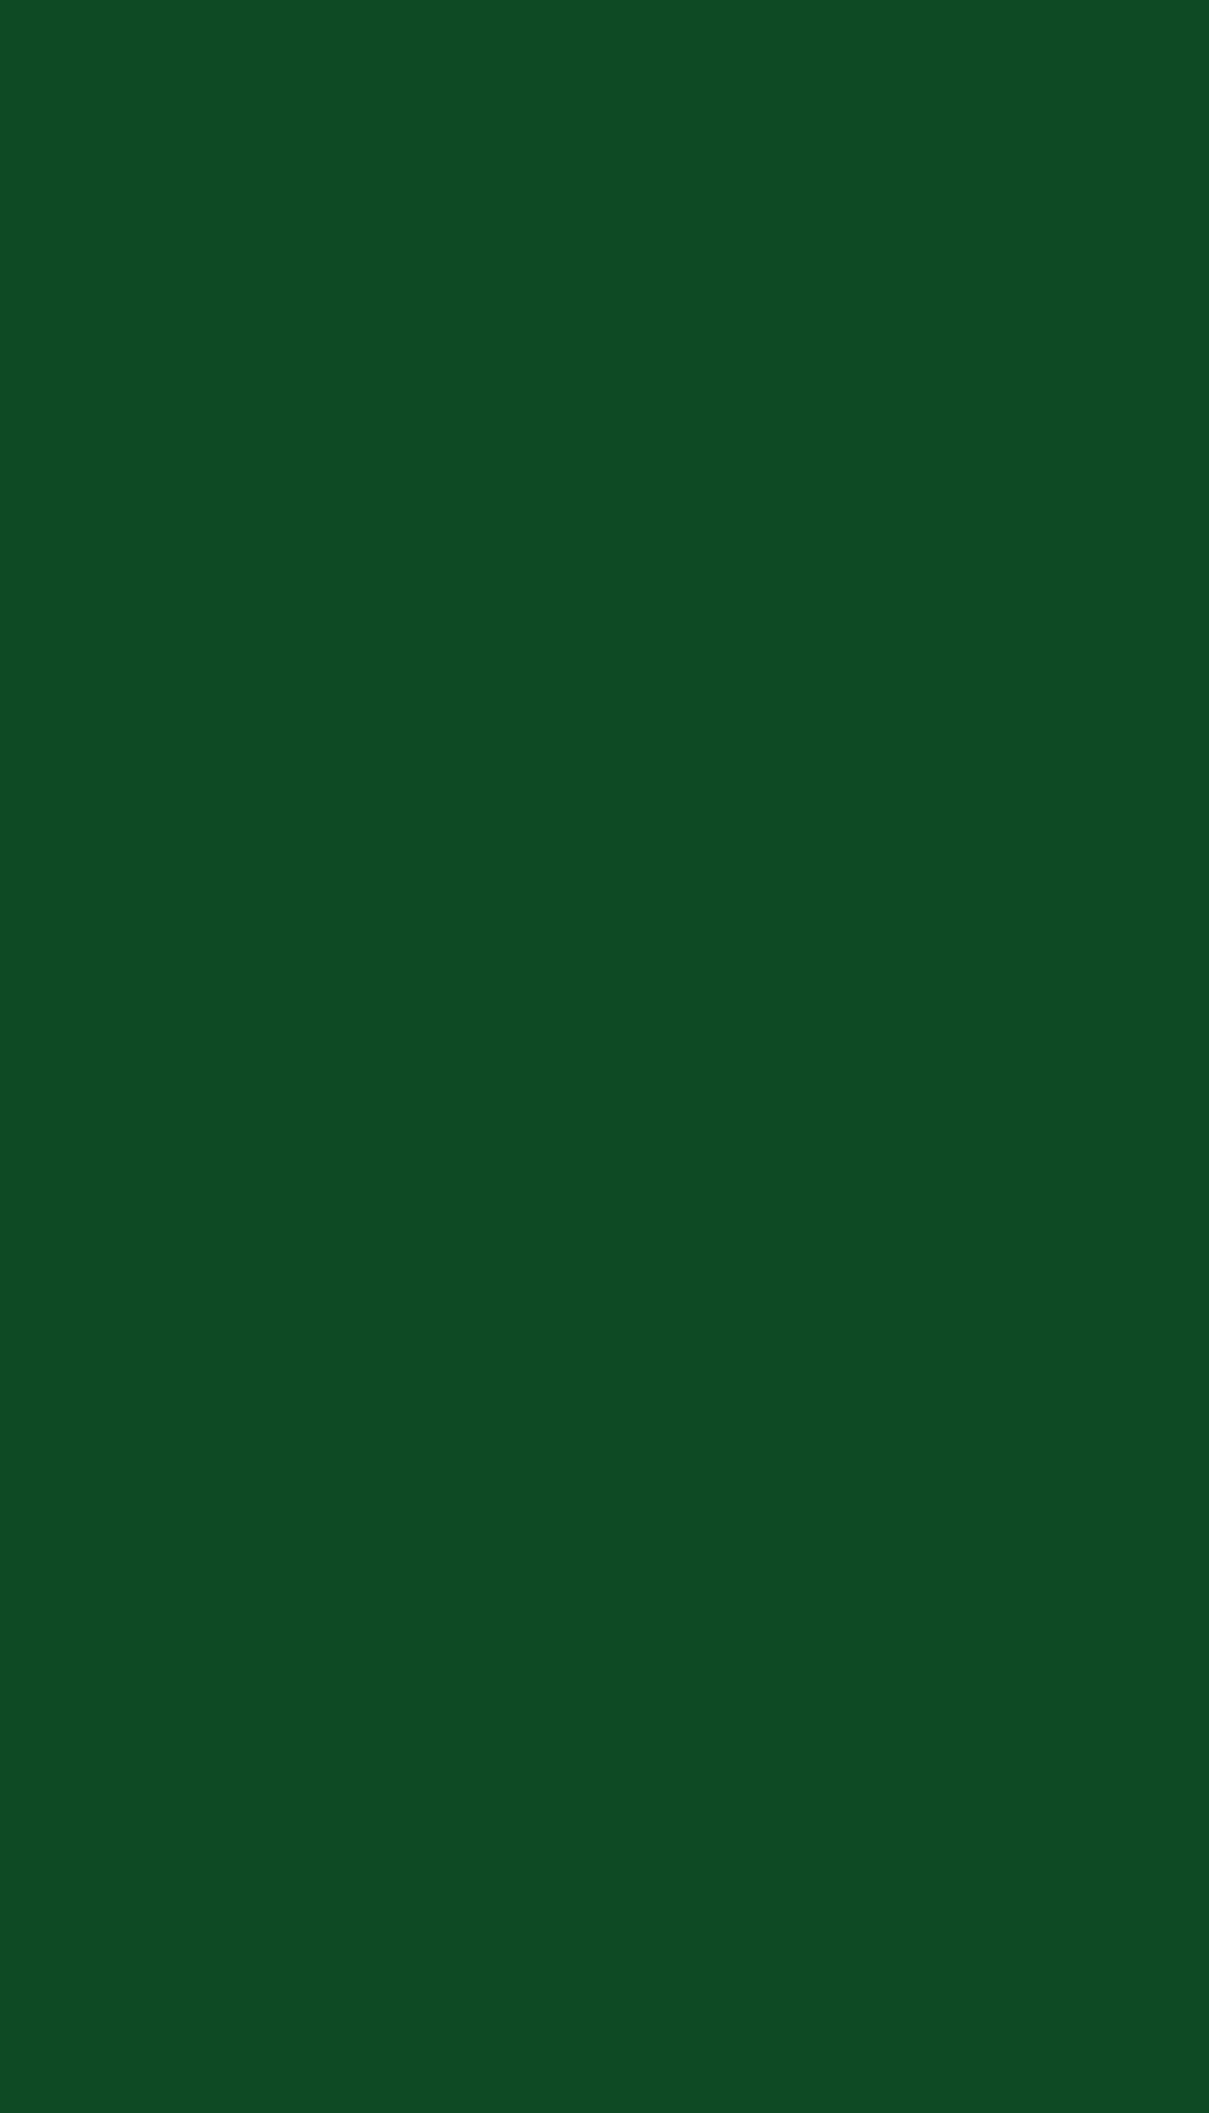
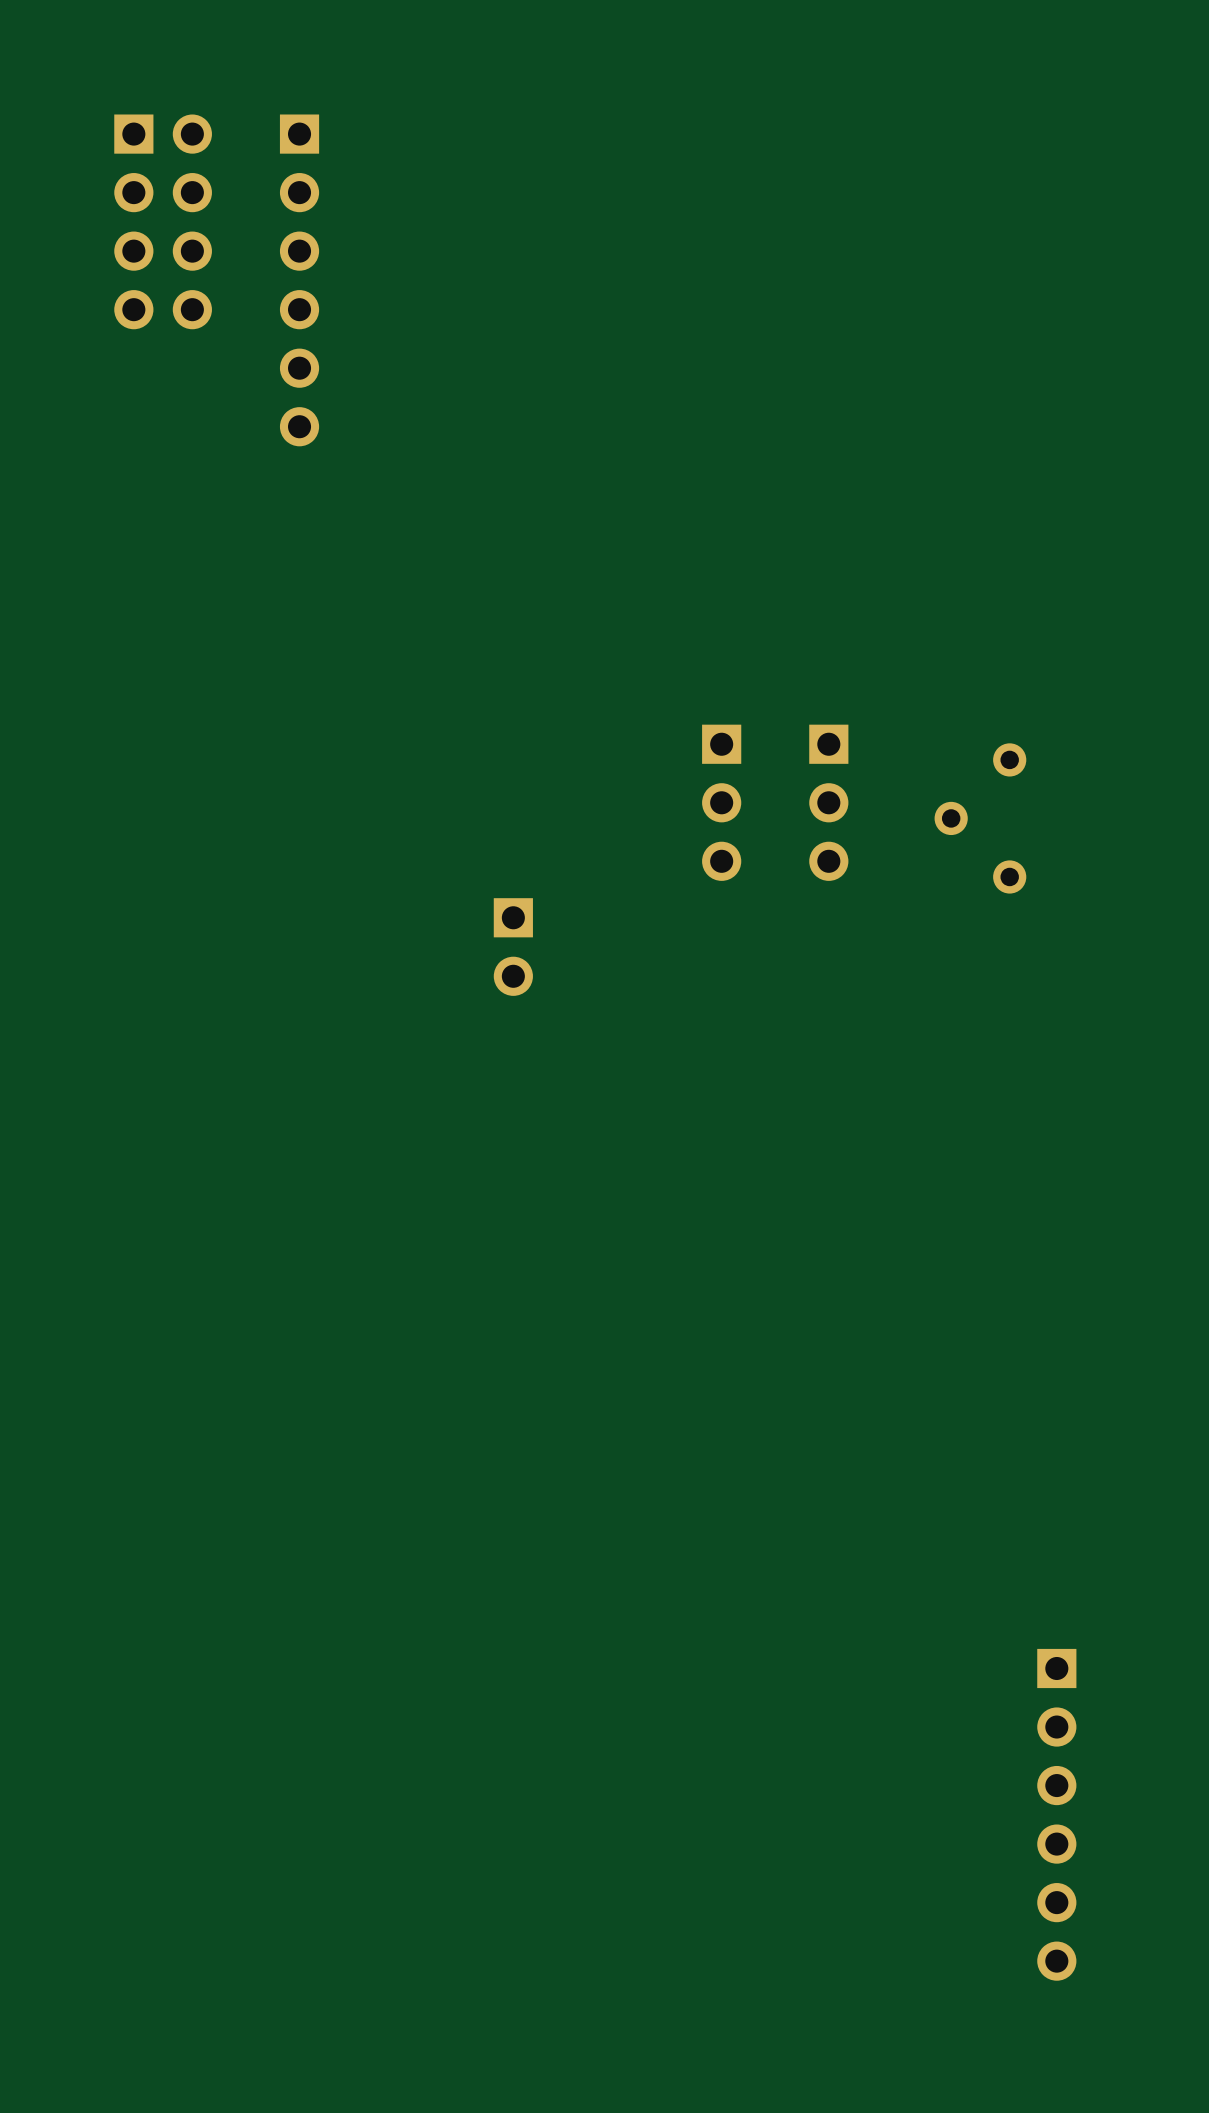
part: none -> (163, 221)
part: none -> (299, 280)
part: none -> (721, 802)
part: none -> (828, 802)
part: none -> (980, 818)
part: none -> (513, 947)
part: none -> (1056, 1814)

